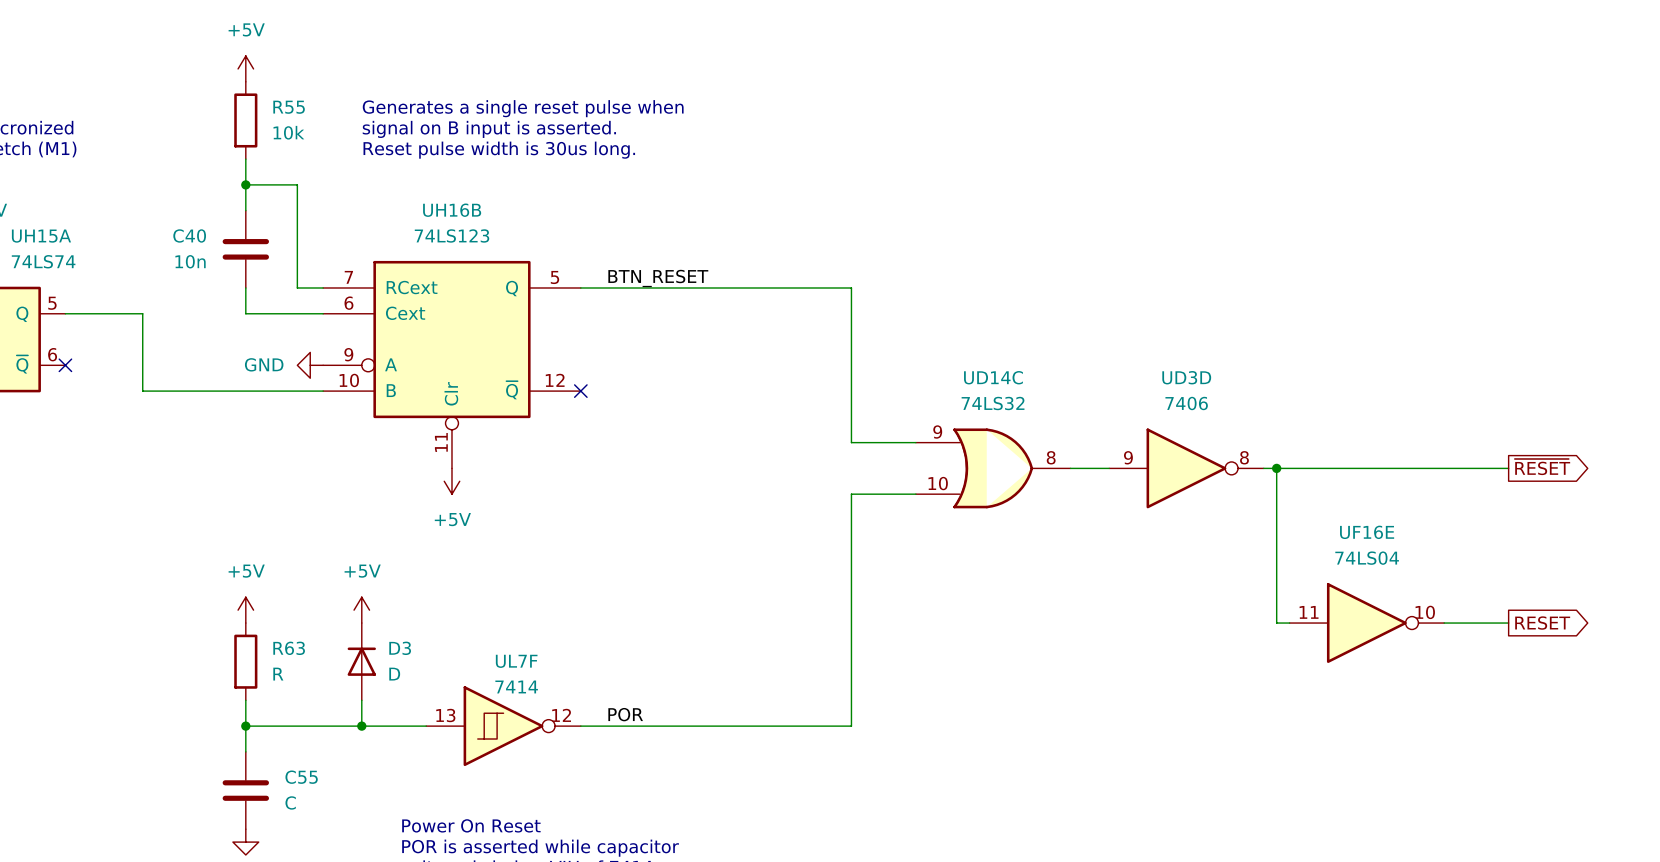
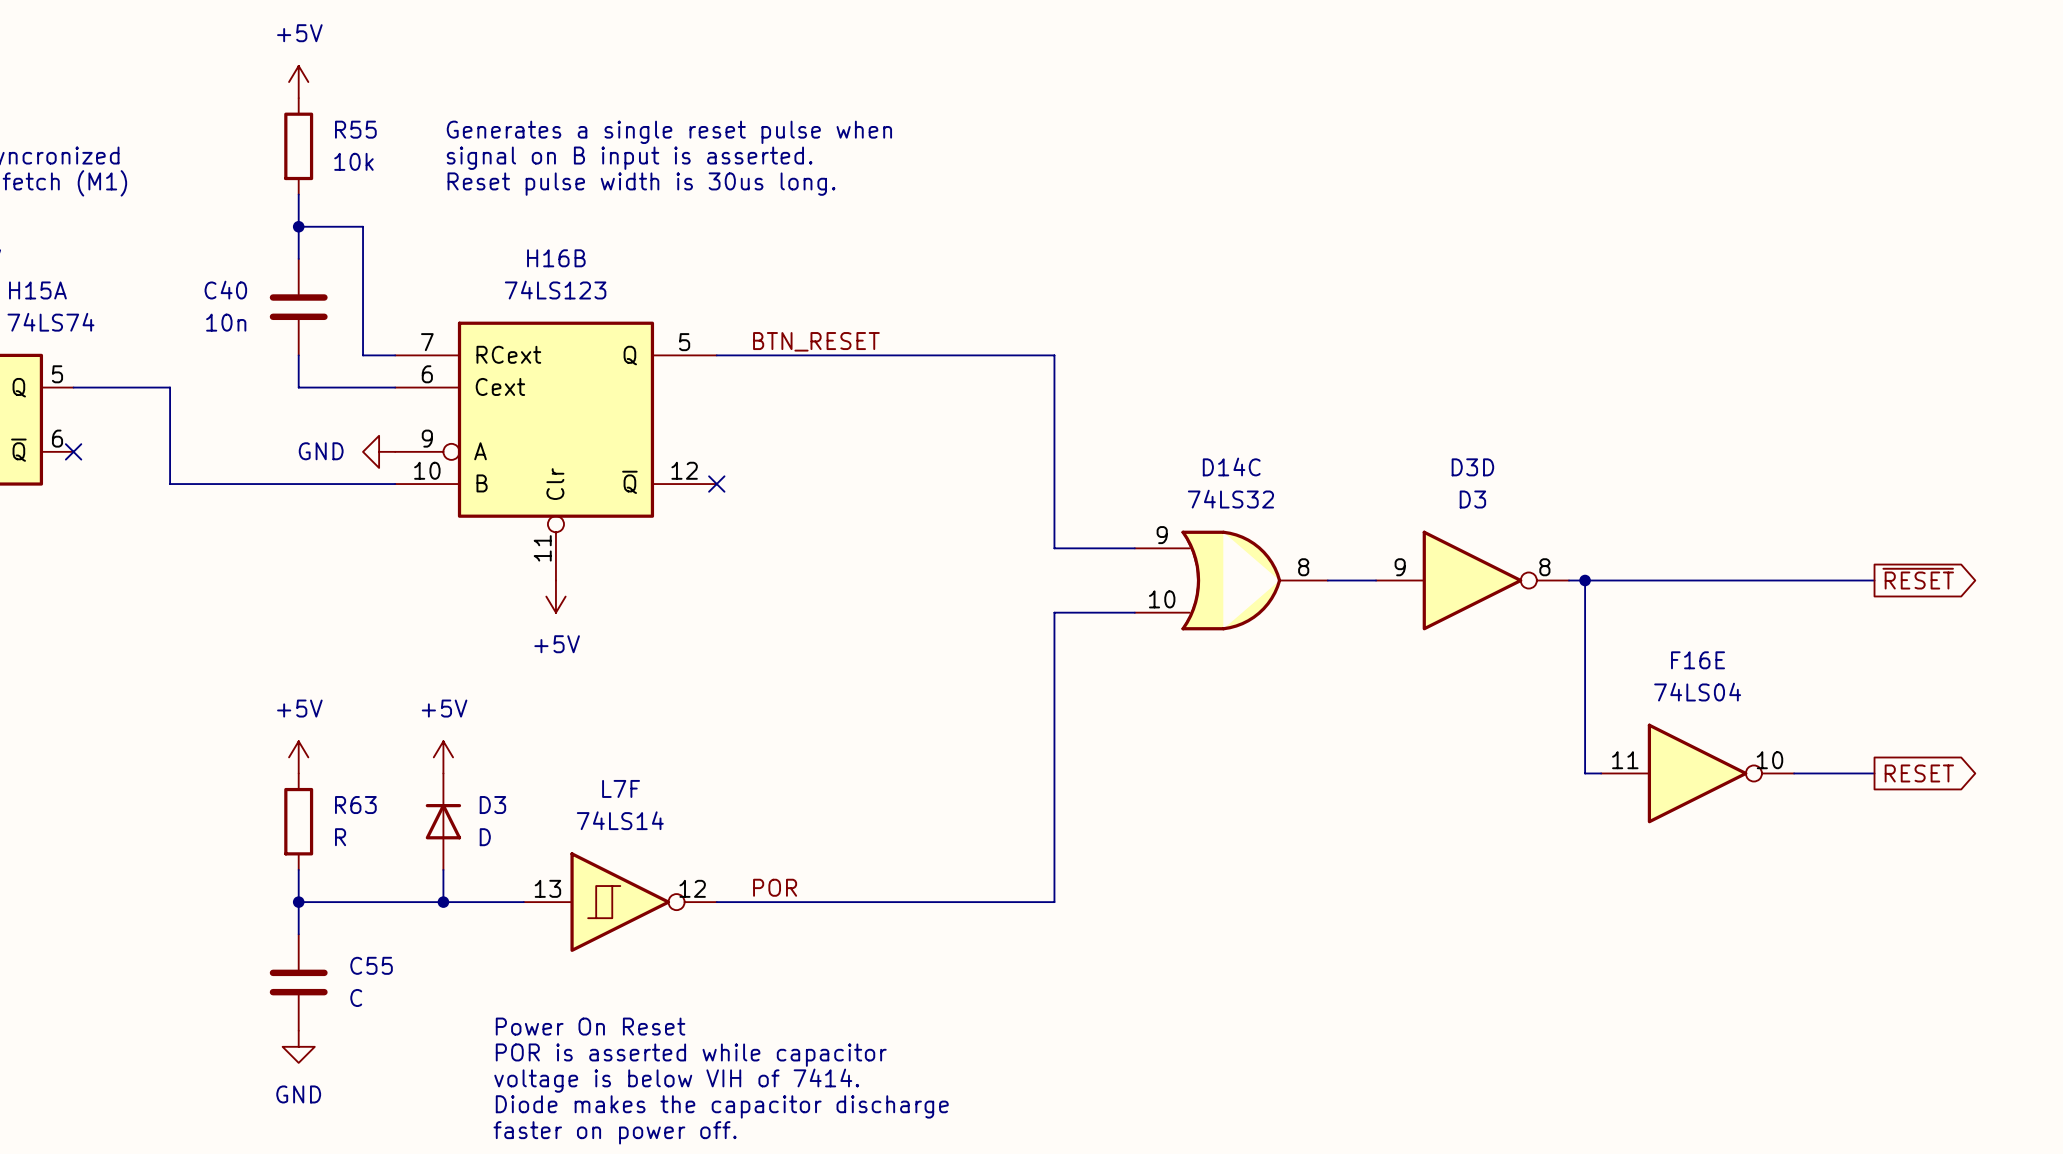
UH16B name: UH16B (452, 210) -> H16B (556, 258)
UH15A name: UH15A (41, 236) -> H15A (37, 290)
UD14C name: UD14C (993, 377) -> D14C (1231, 466)
UD3D name: UD3D (1186, 377) -> D3D (1472, 467)
UD3D value: 7406 (1186, 403) -> D3 (1472, 499)
UF16E name: UF16E (1367, 532) -> F16E (1698, 660)
UL7F name: UL7F (516, 661) -> L7F (621, 788)
UL7F value: 7414 (516, 686) -> 74LS14 (620, 820)

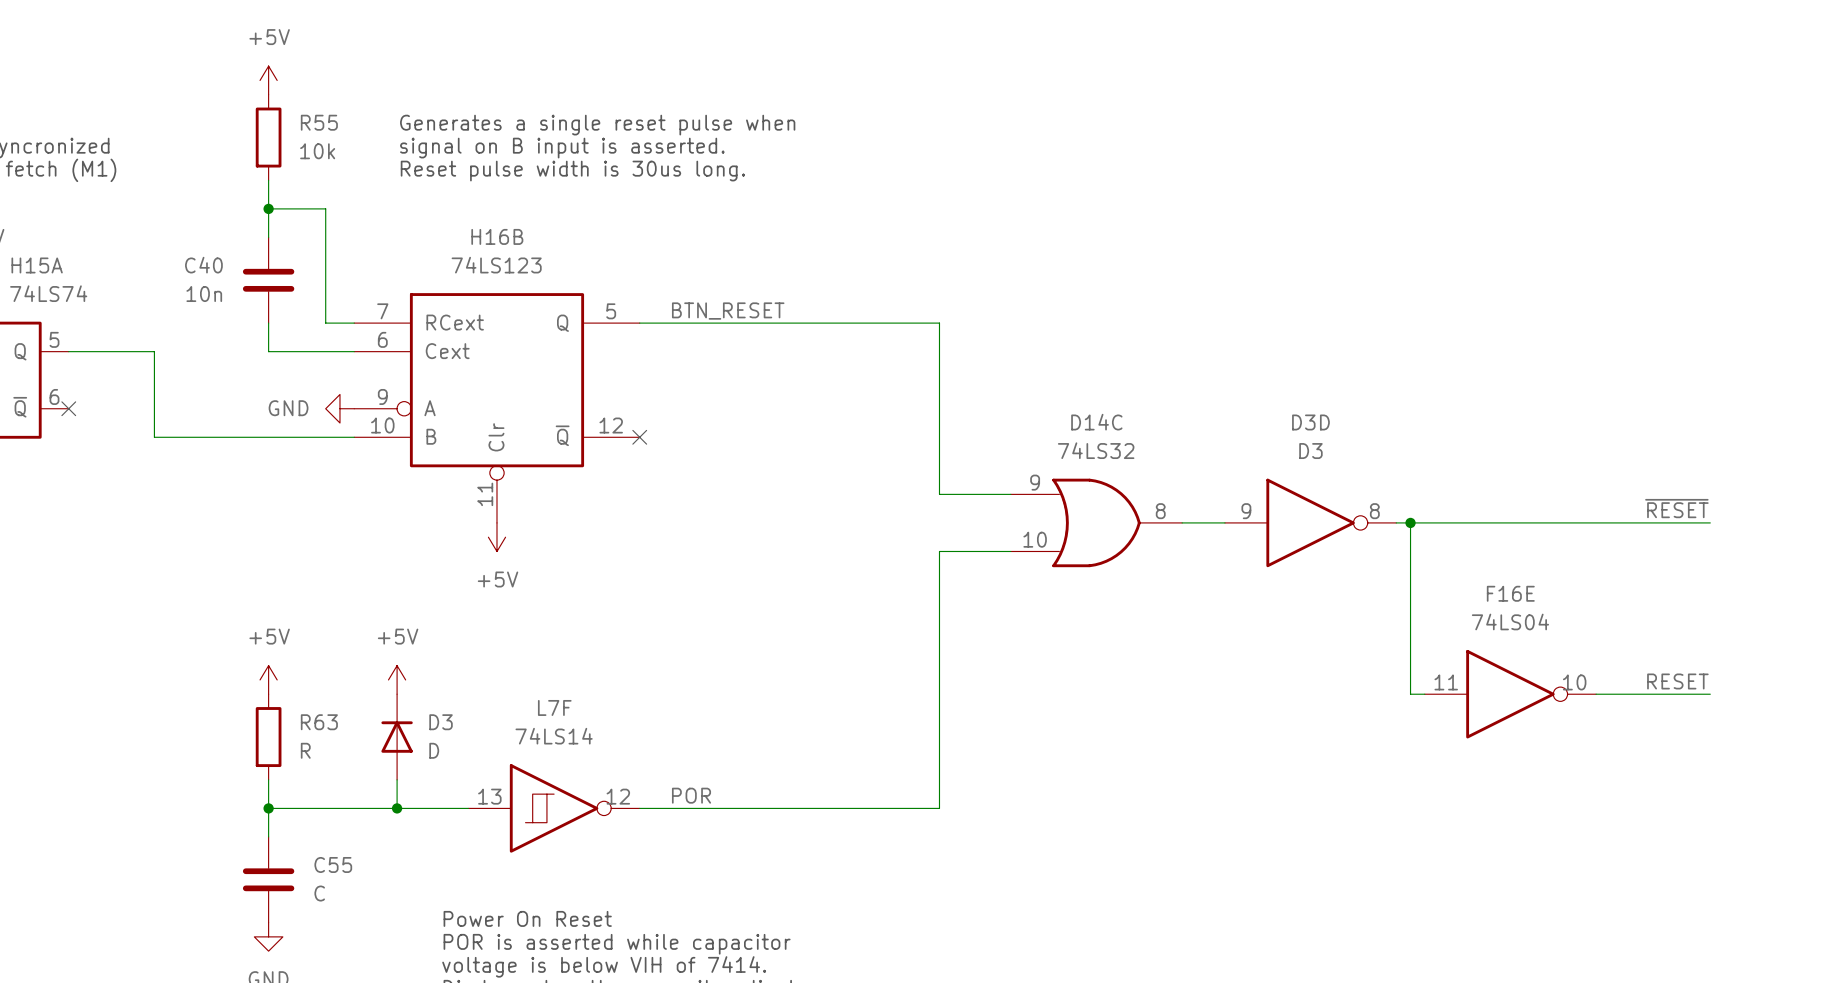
label: none -> ~{RESET} (1676, 508)
global label: ~{RESET} (1918, 578) -> none
wire: none -> (1667, 522) (1710, 522)
label: none -> RESET (1677, 681)
wire: none -> (1667, 694) (1710, 694)
global label: RESET (1919, 773) -> none

